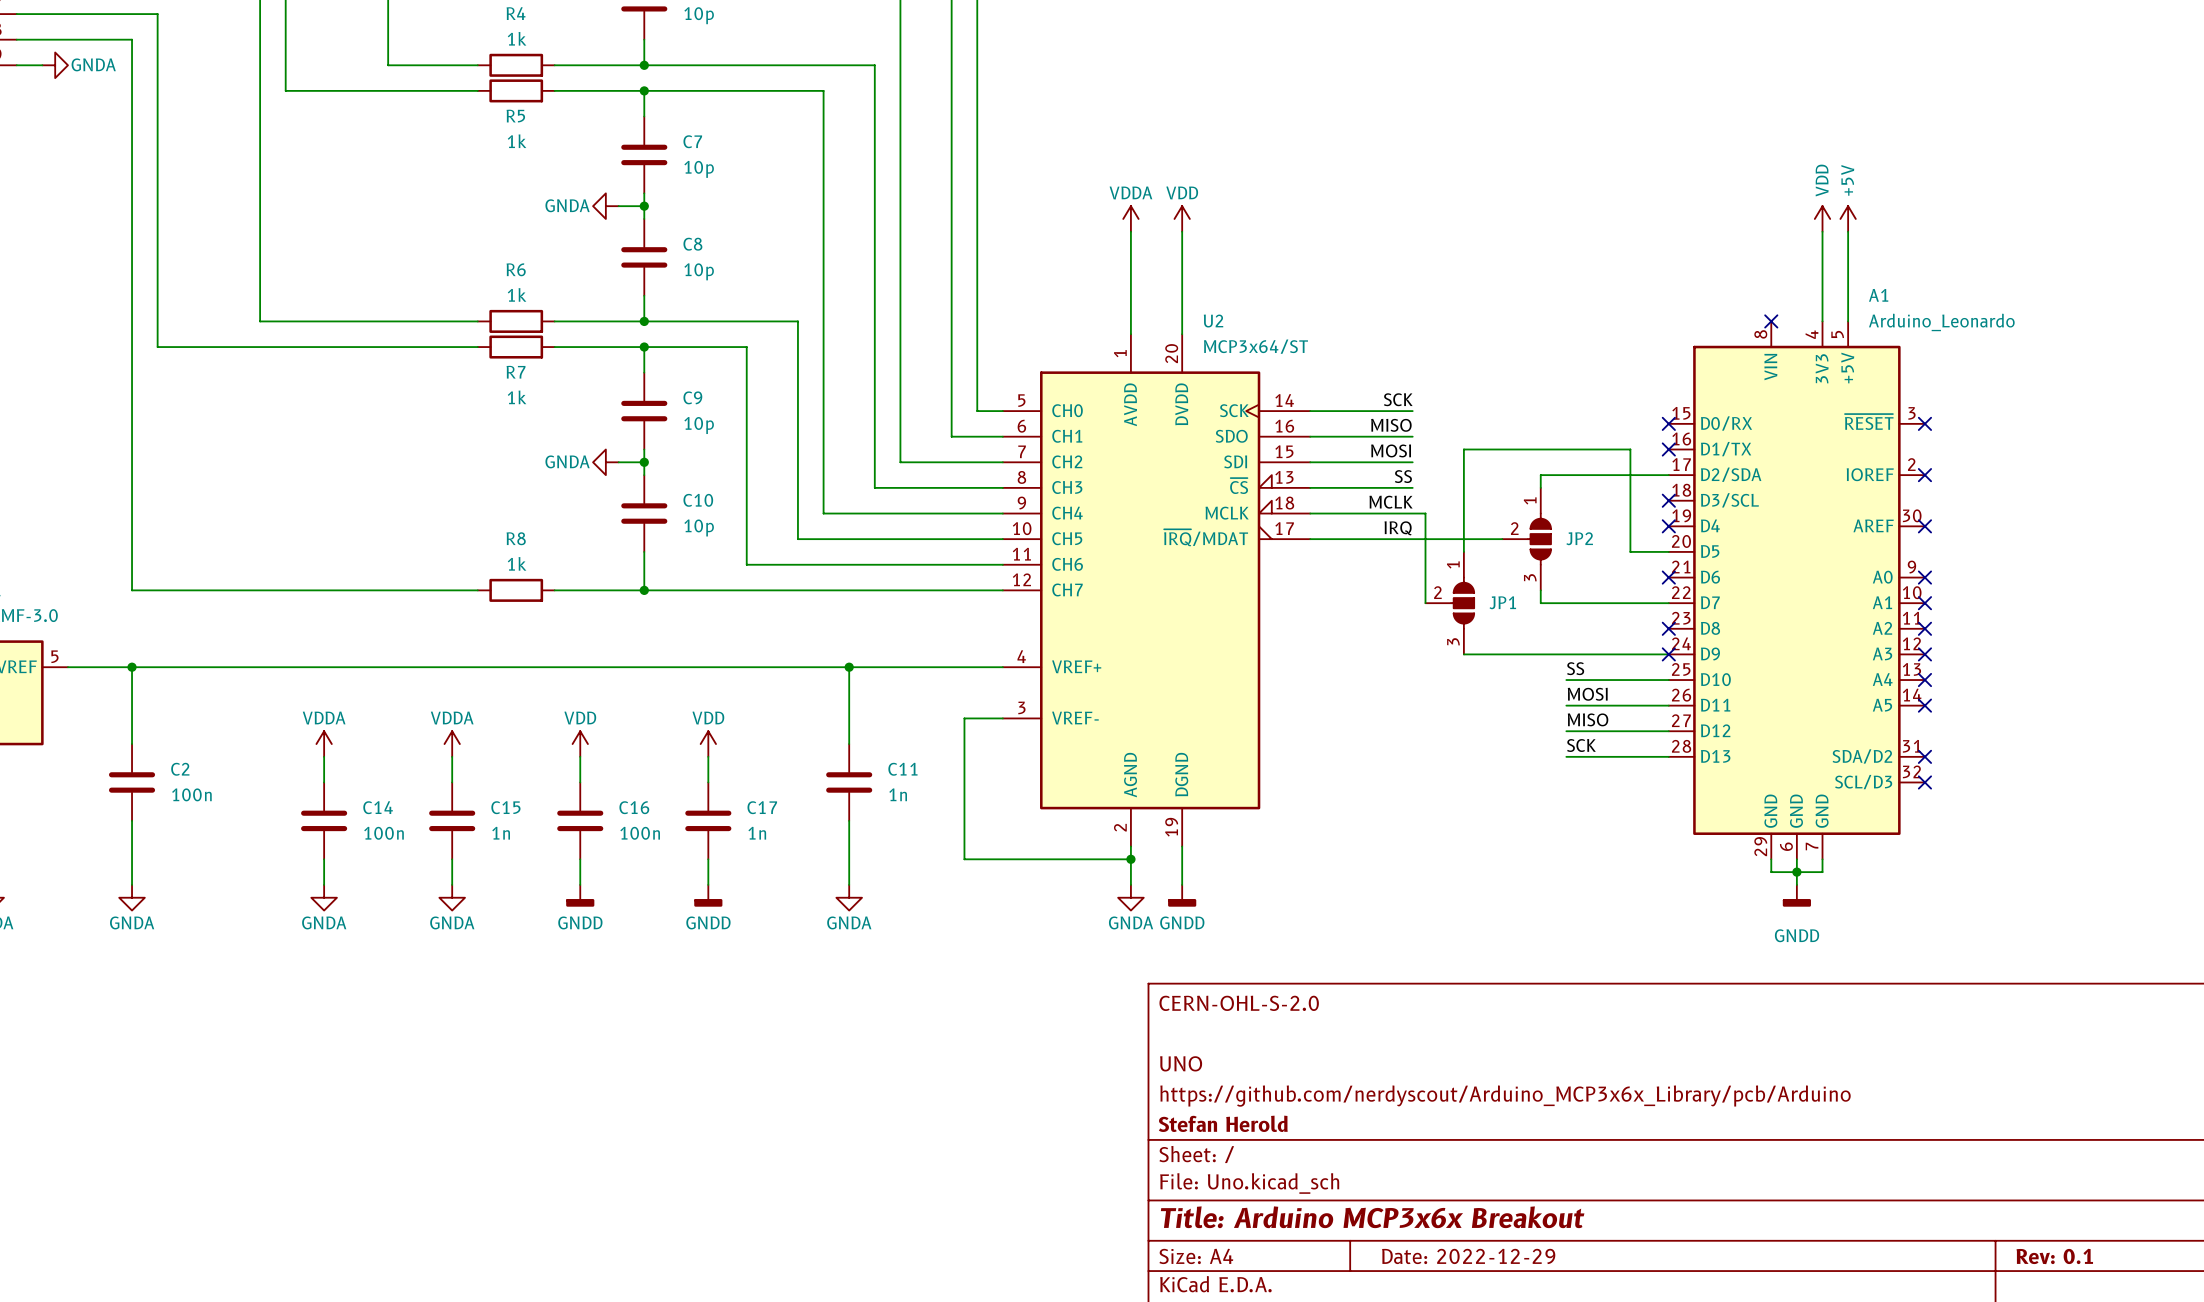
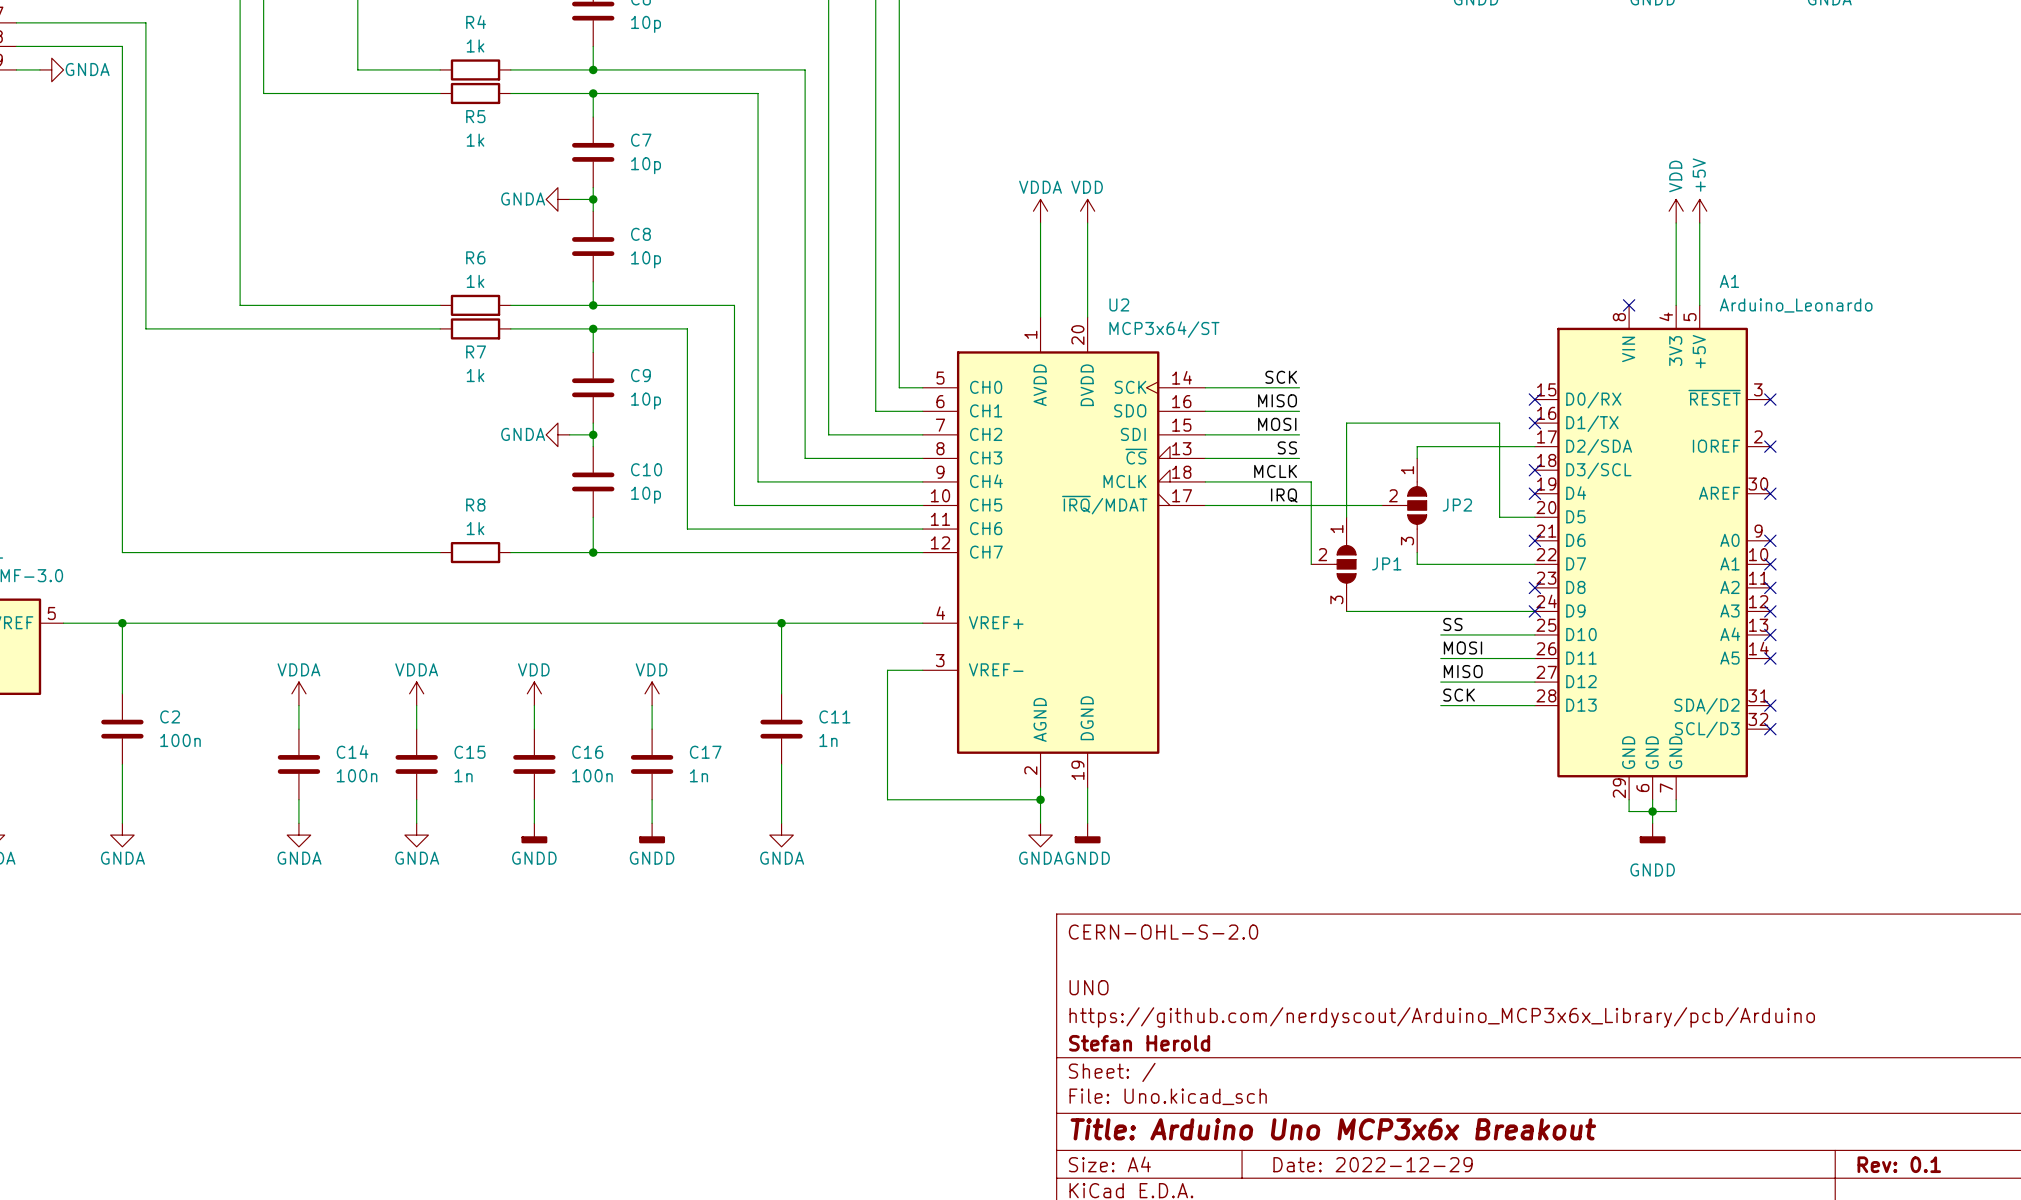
title block: Title: Arduino MCP3x6x Breakout (1372, 1217) -> Title: Arduino Uno MCP3x6x Breakout (1333, 1129)

